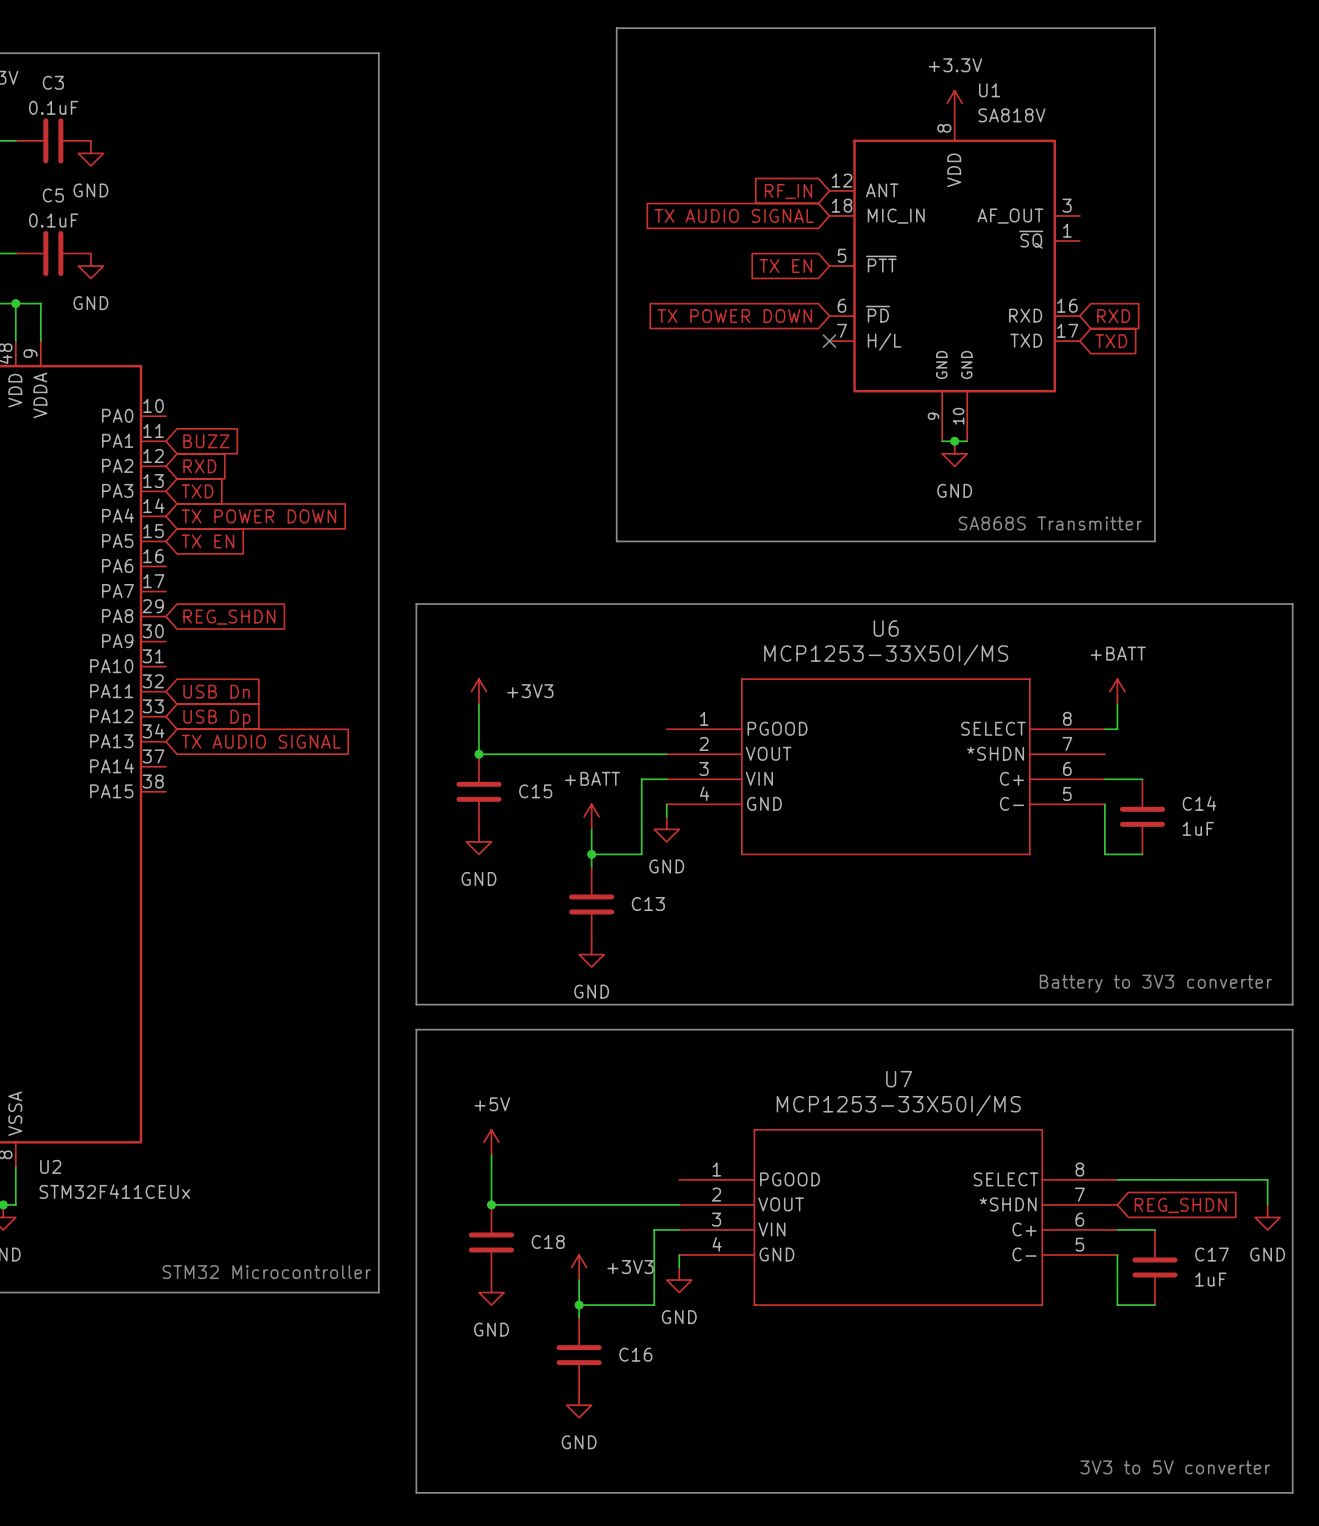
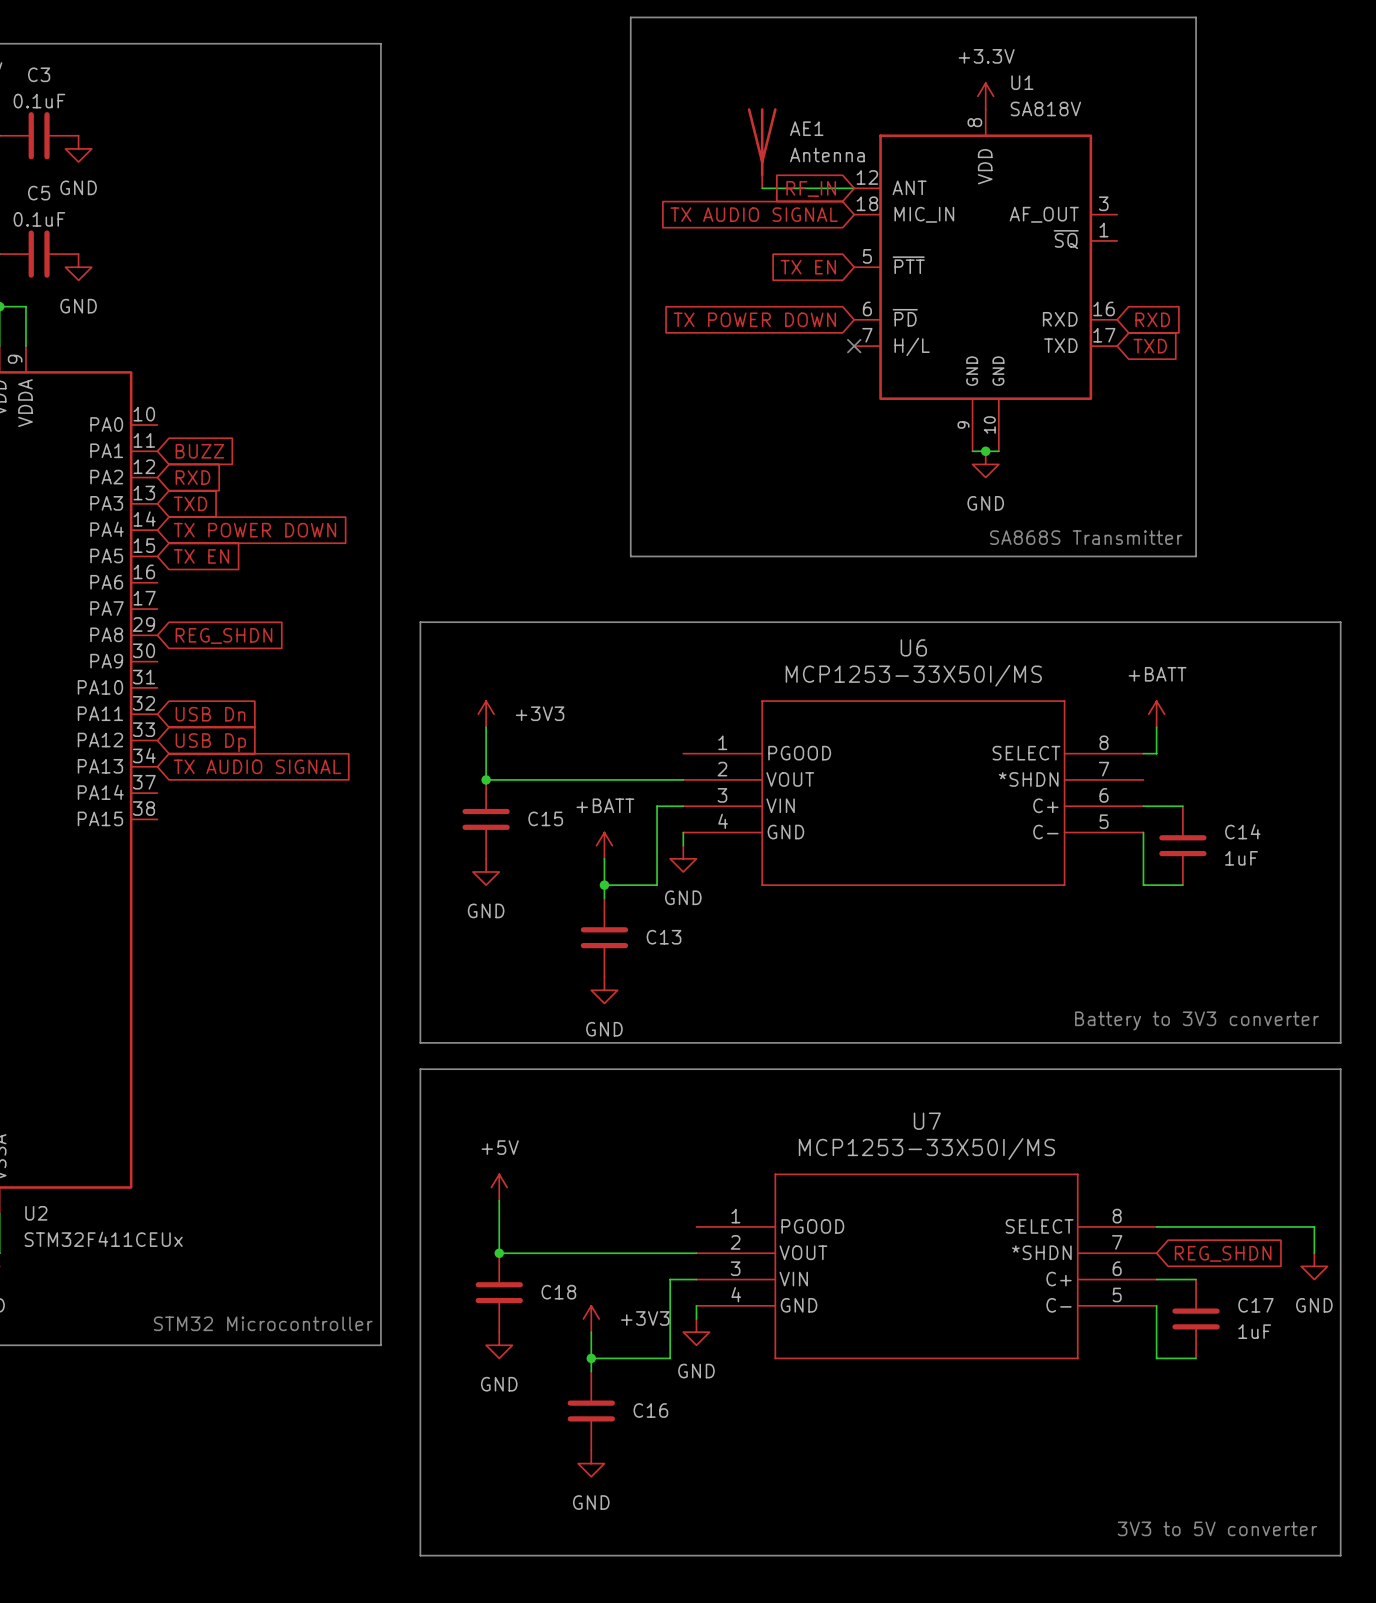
AE1: none -> Antenna (762, 148)
wire: none -> (762, 188) (854, 188)

